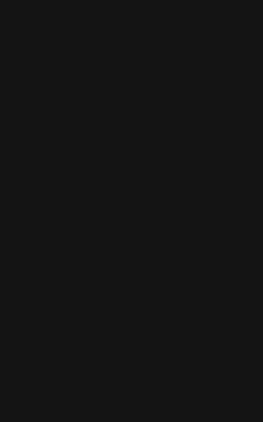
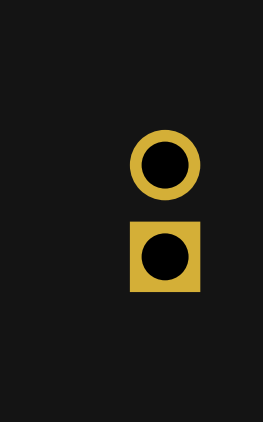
part: none -> (165, 210)

